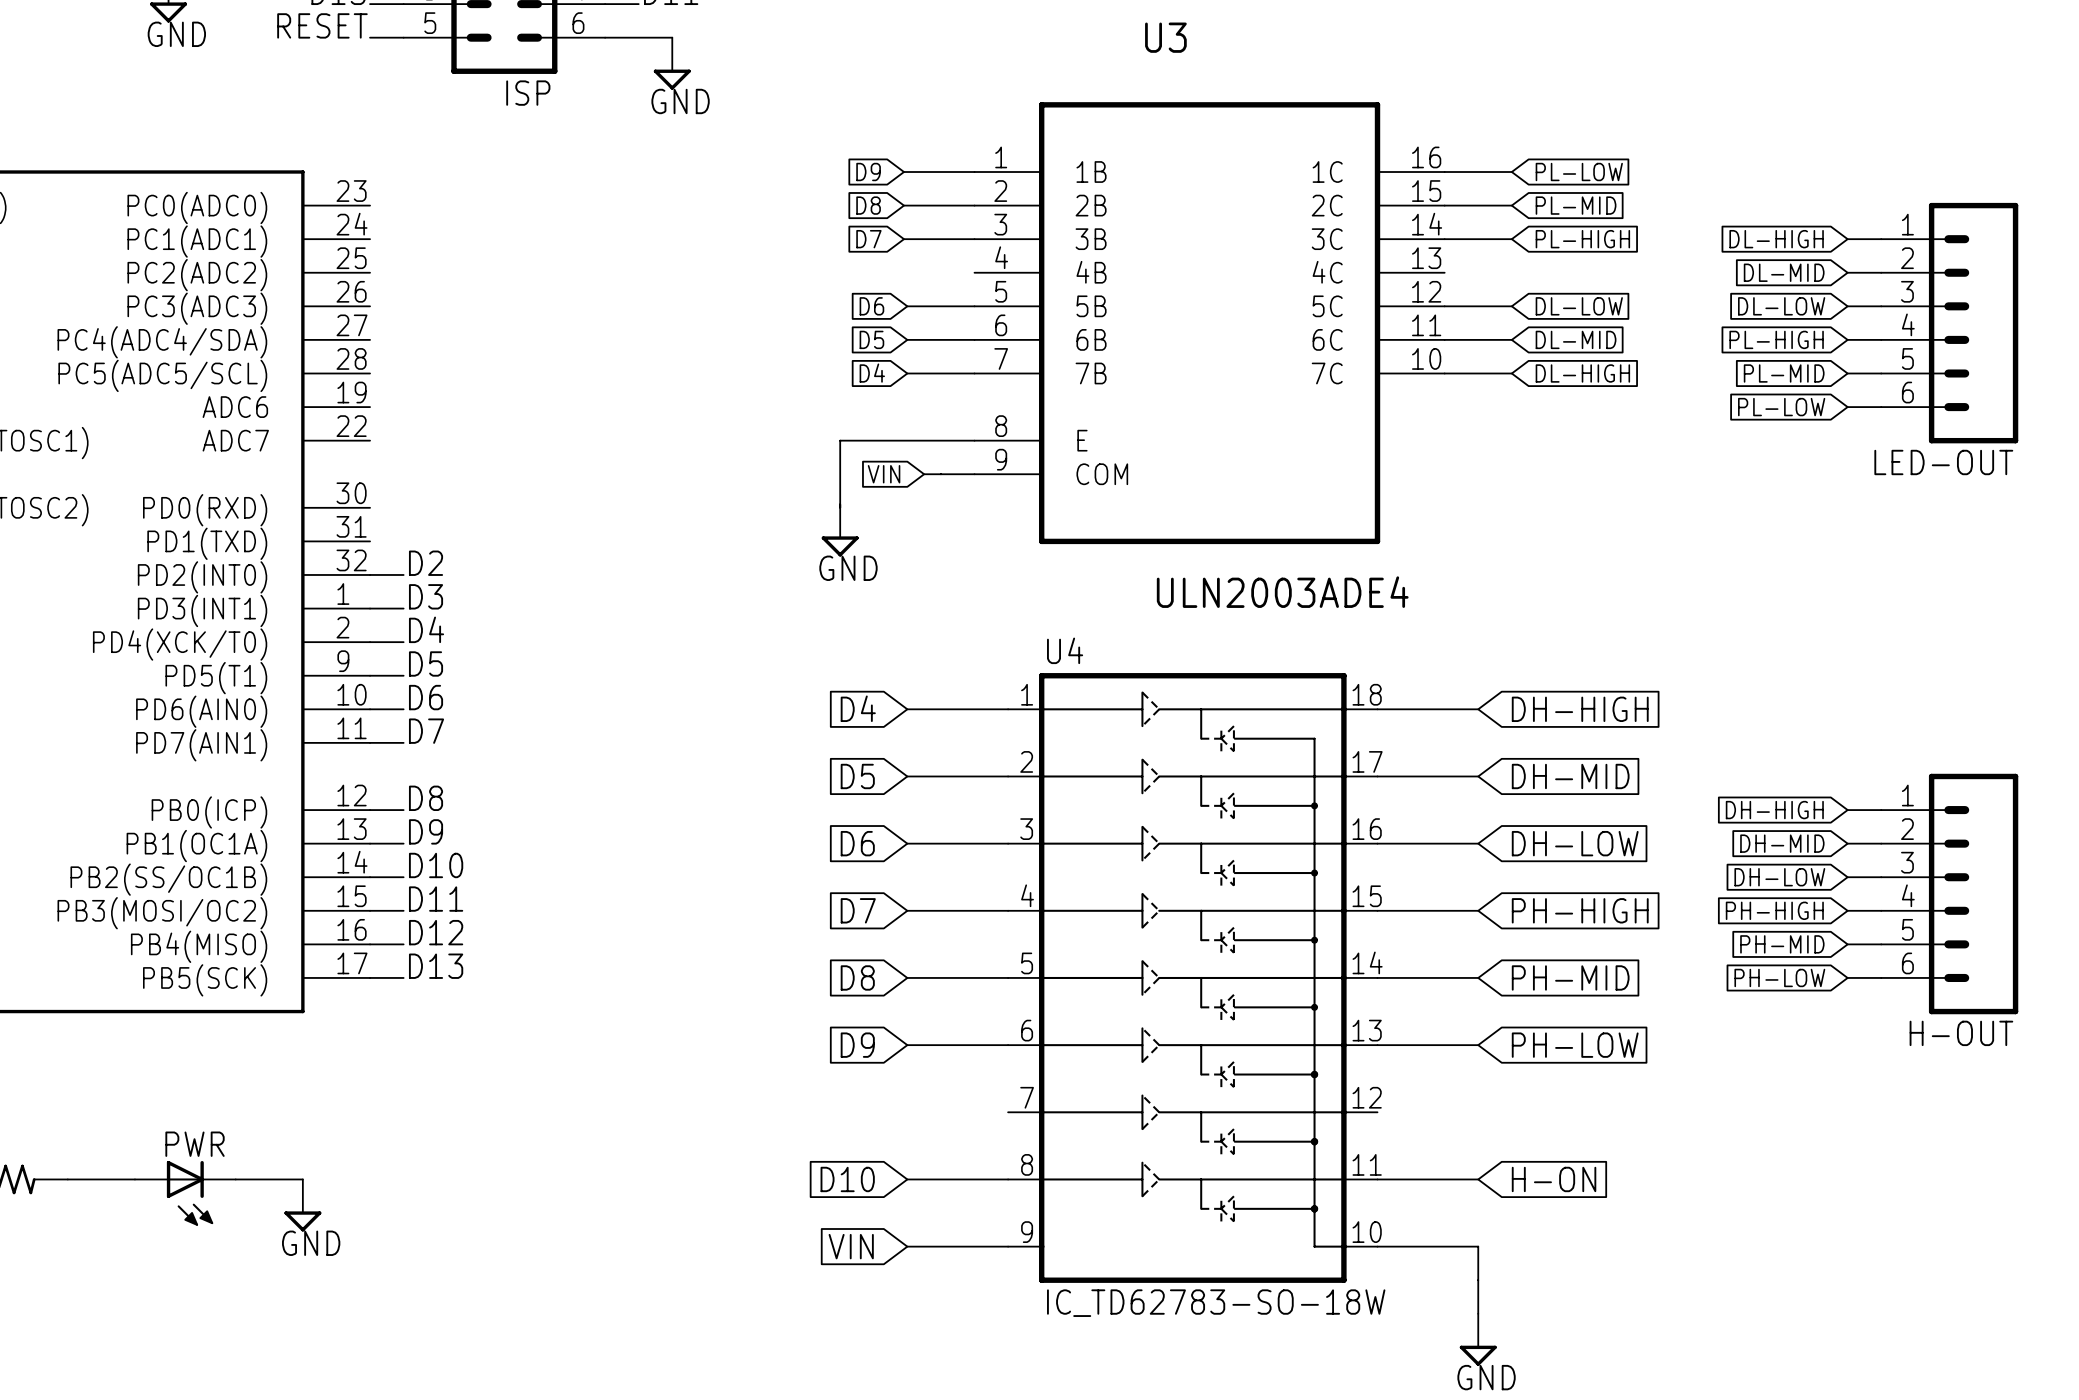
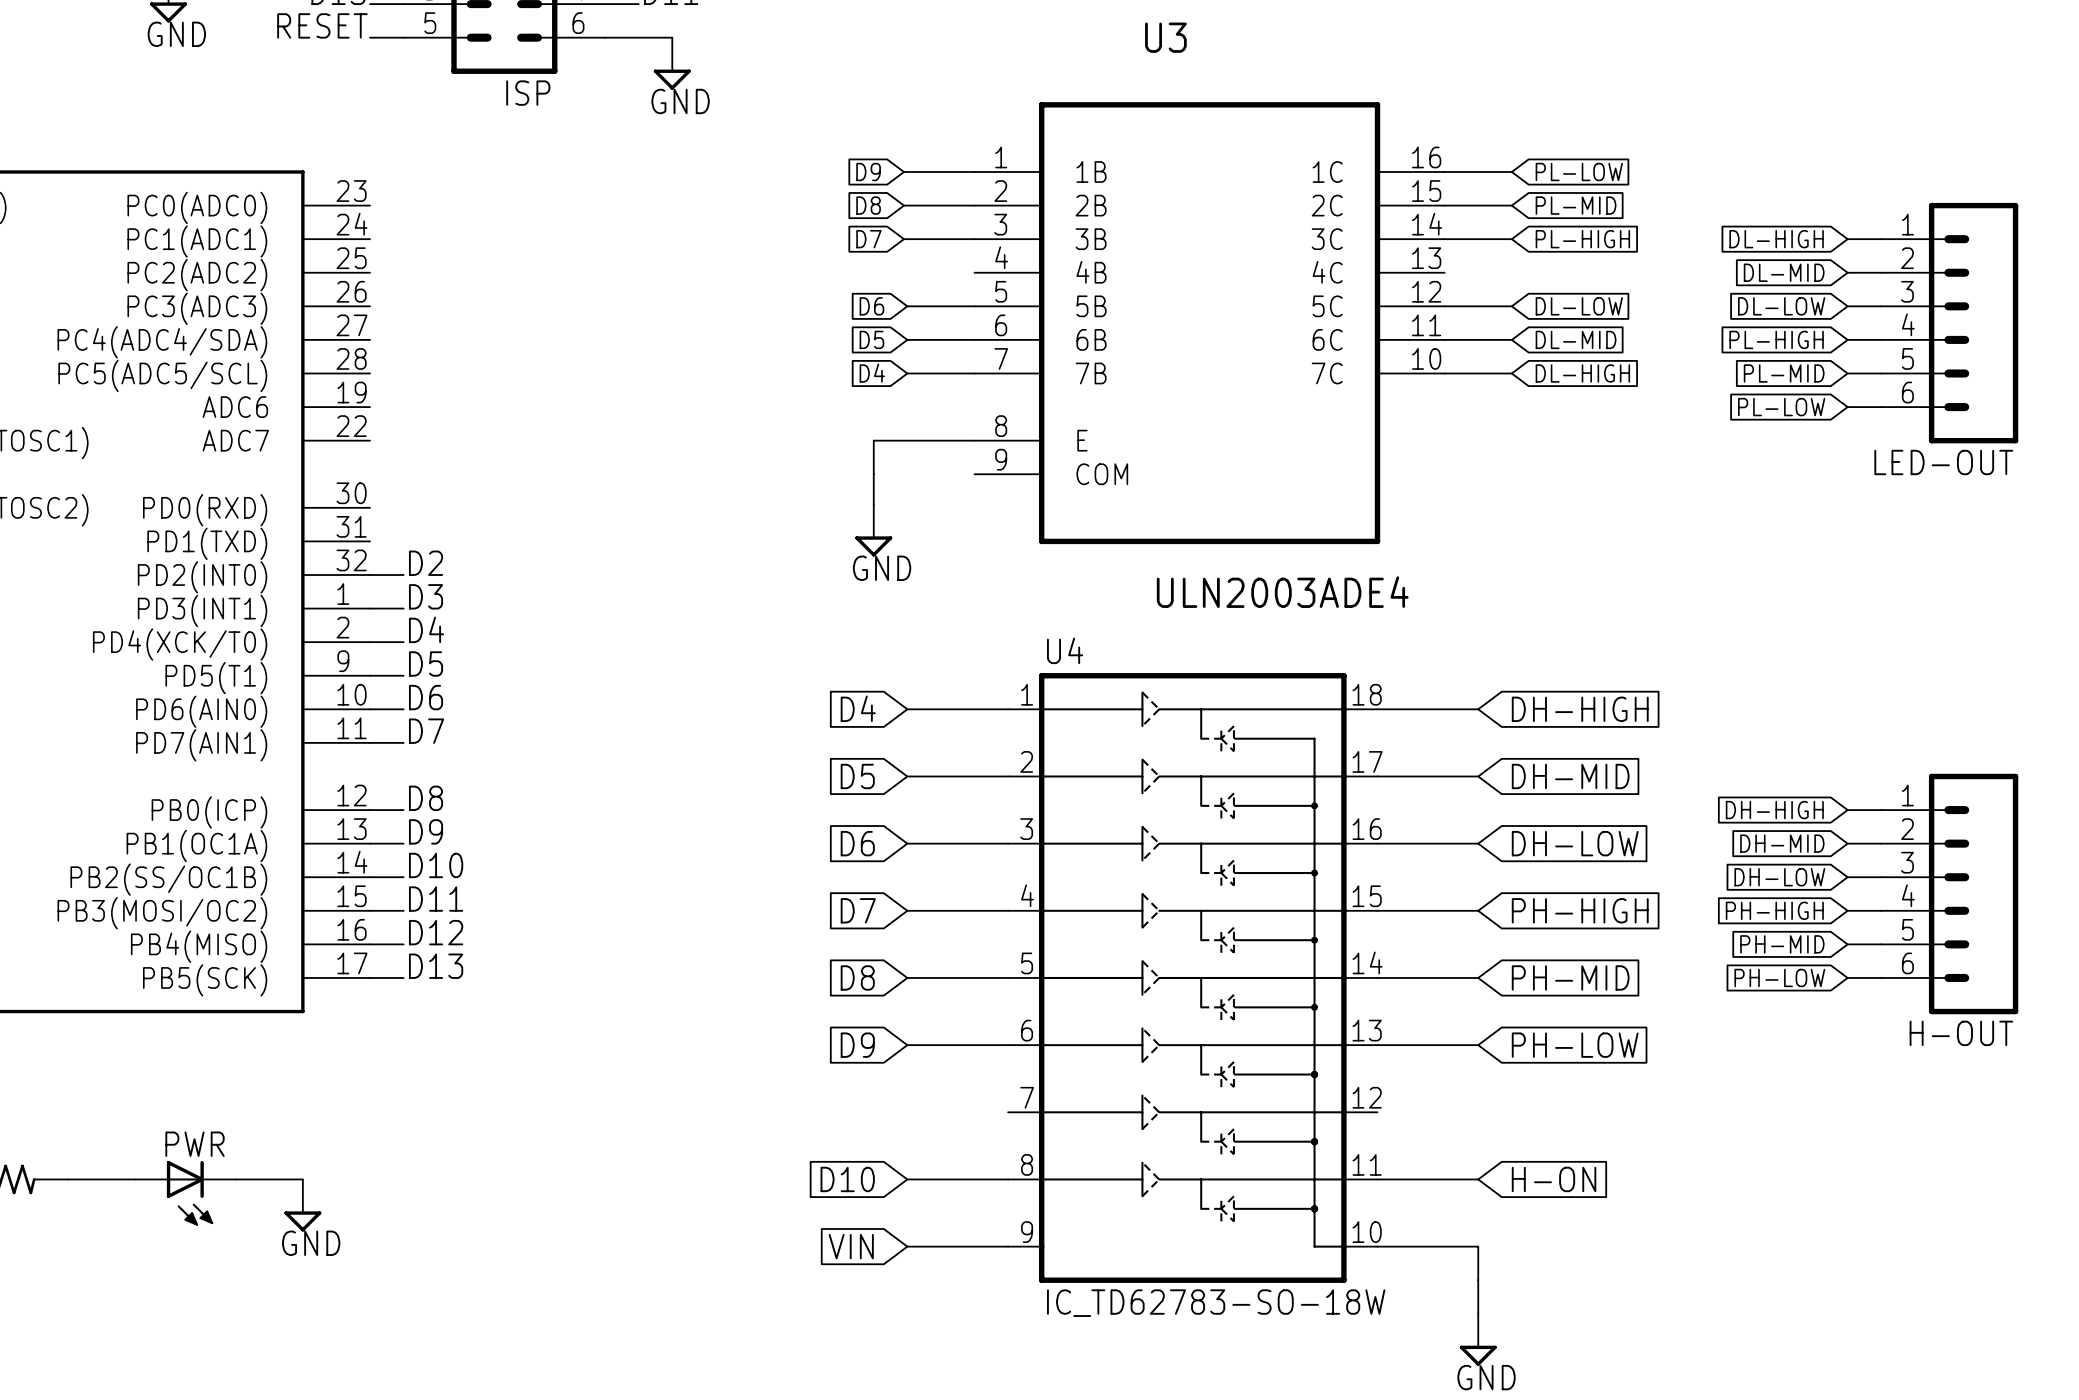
wire: (873, 440) (840, 440) (840, 507) -> (873, 440) (873, 504)
global label: VIN (884, 474) -> none
wire: (924, 474) (974, 474) -> none
power symbol position: GND (840, 530) -> GND (873, 530)

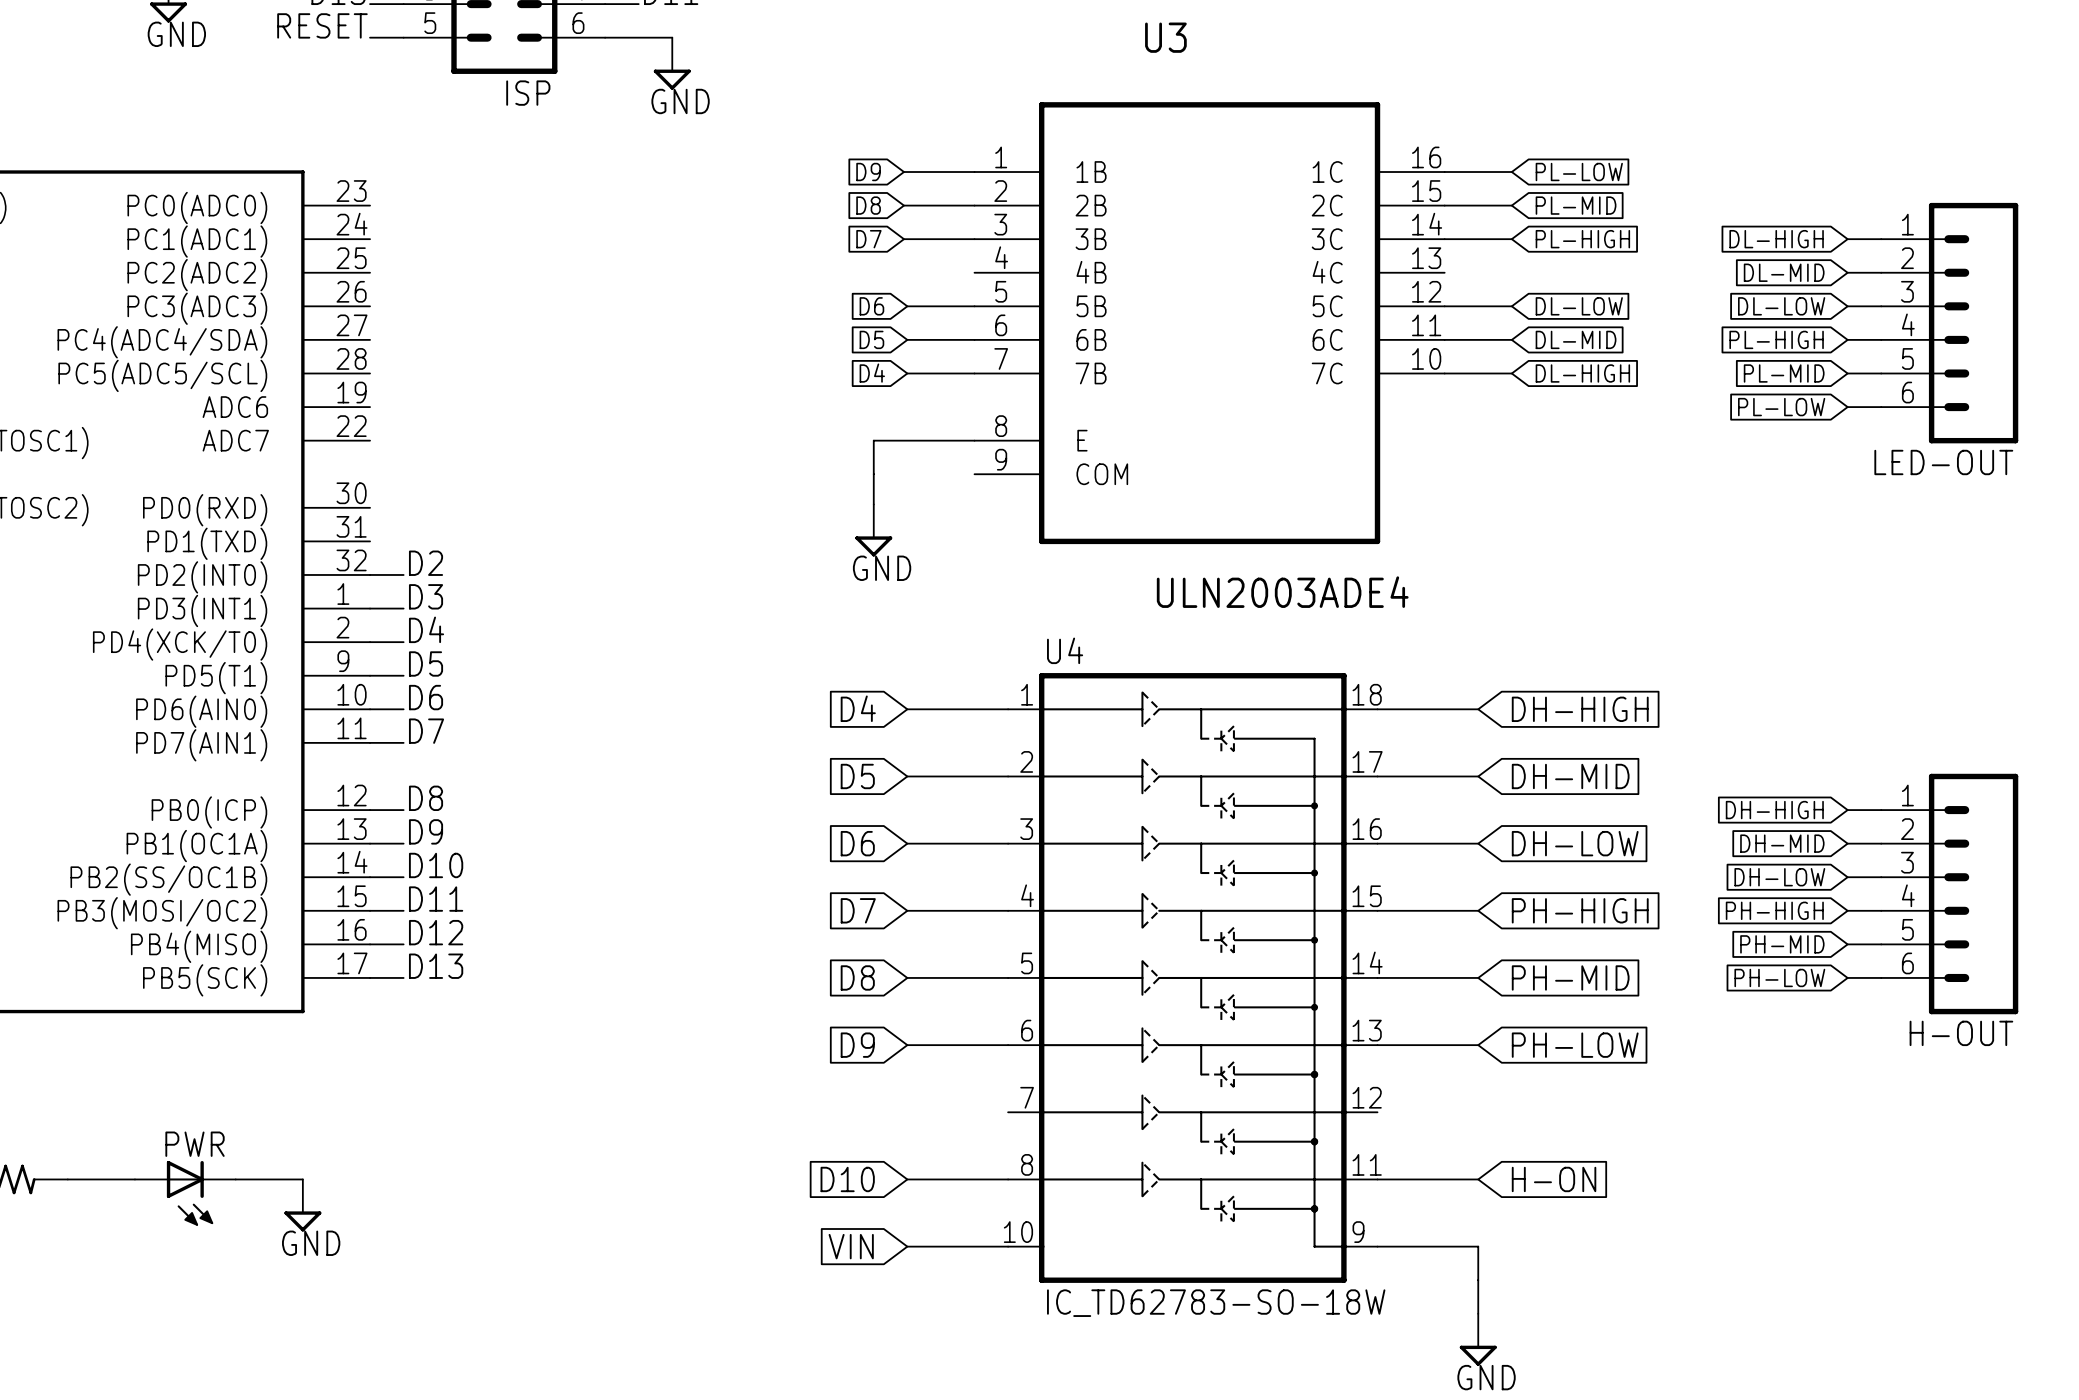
U4 pin number: 9 (1027, 1232) -> 10 (1018, 1232)
U4 pin number: 10 (1367, 1232) -> 9 (1358, 1232)

